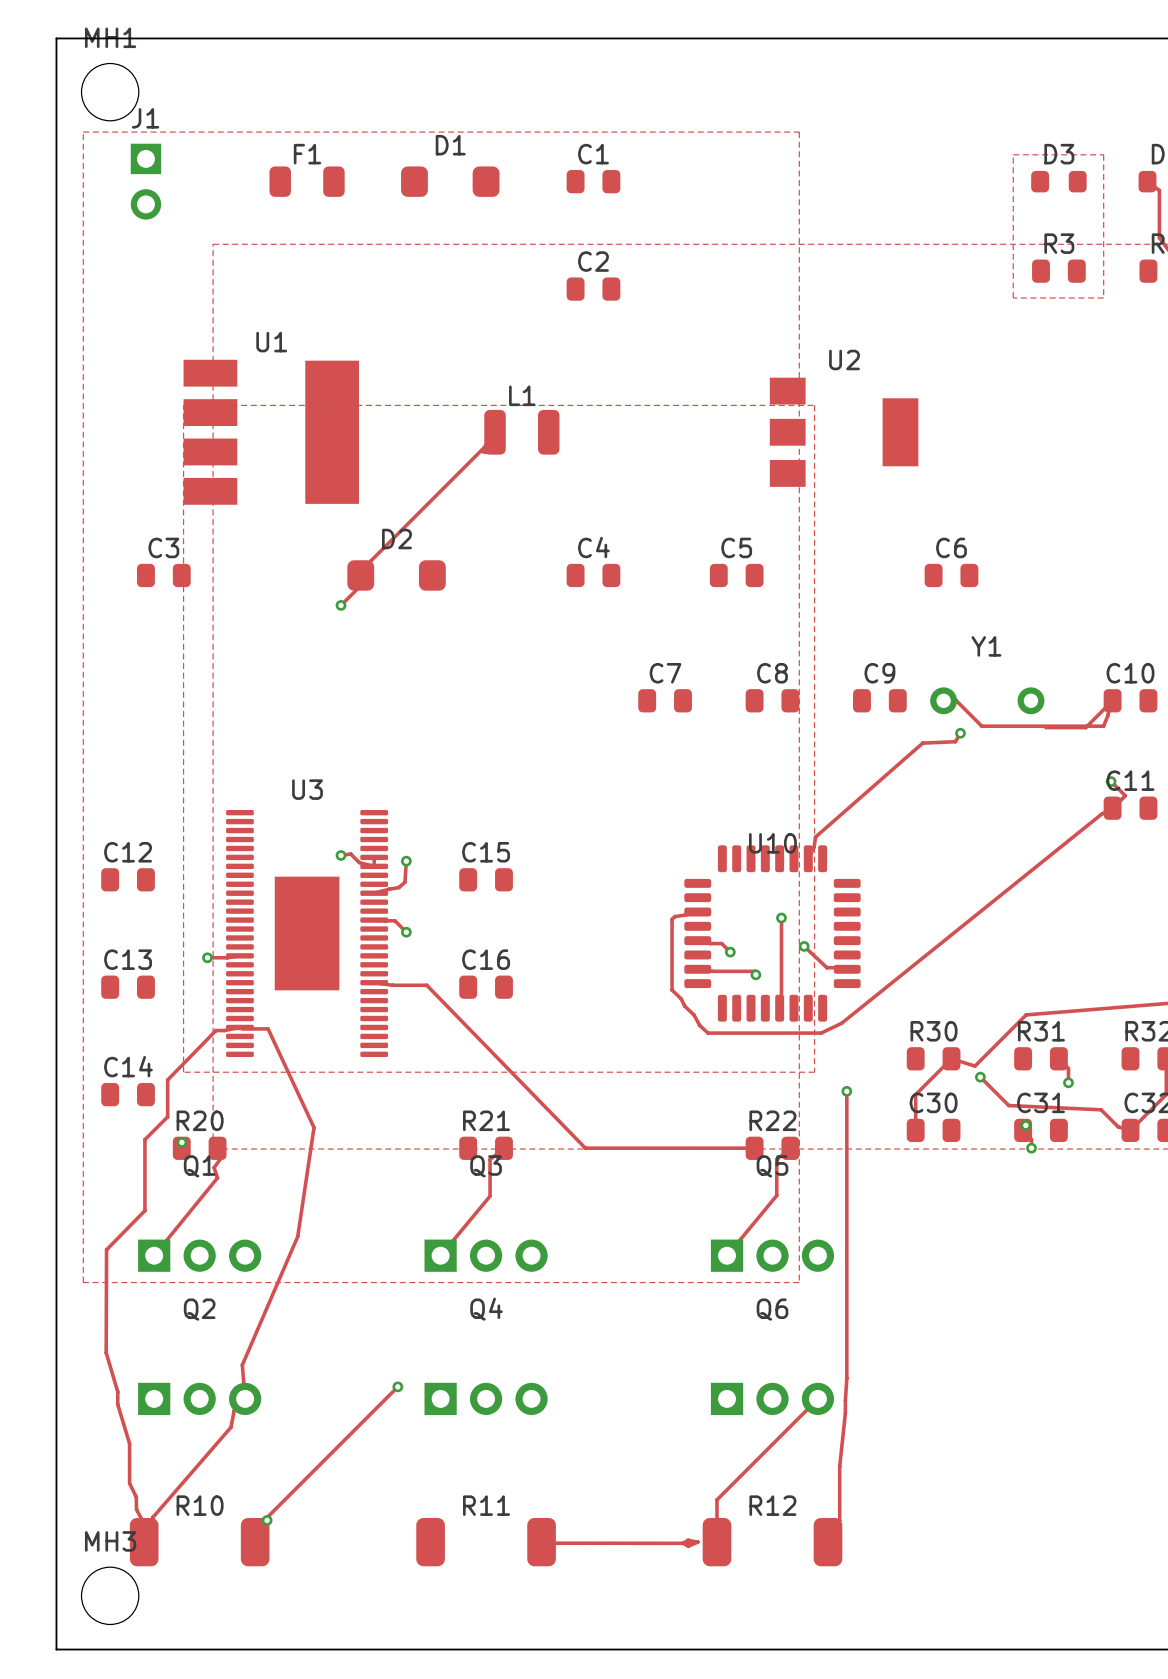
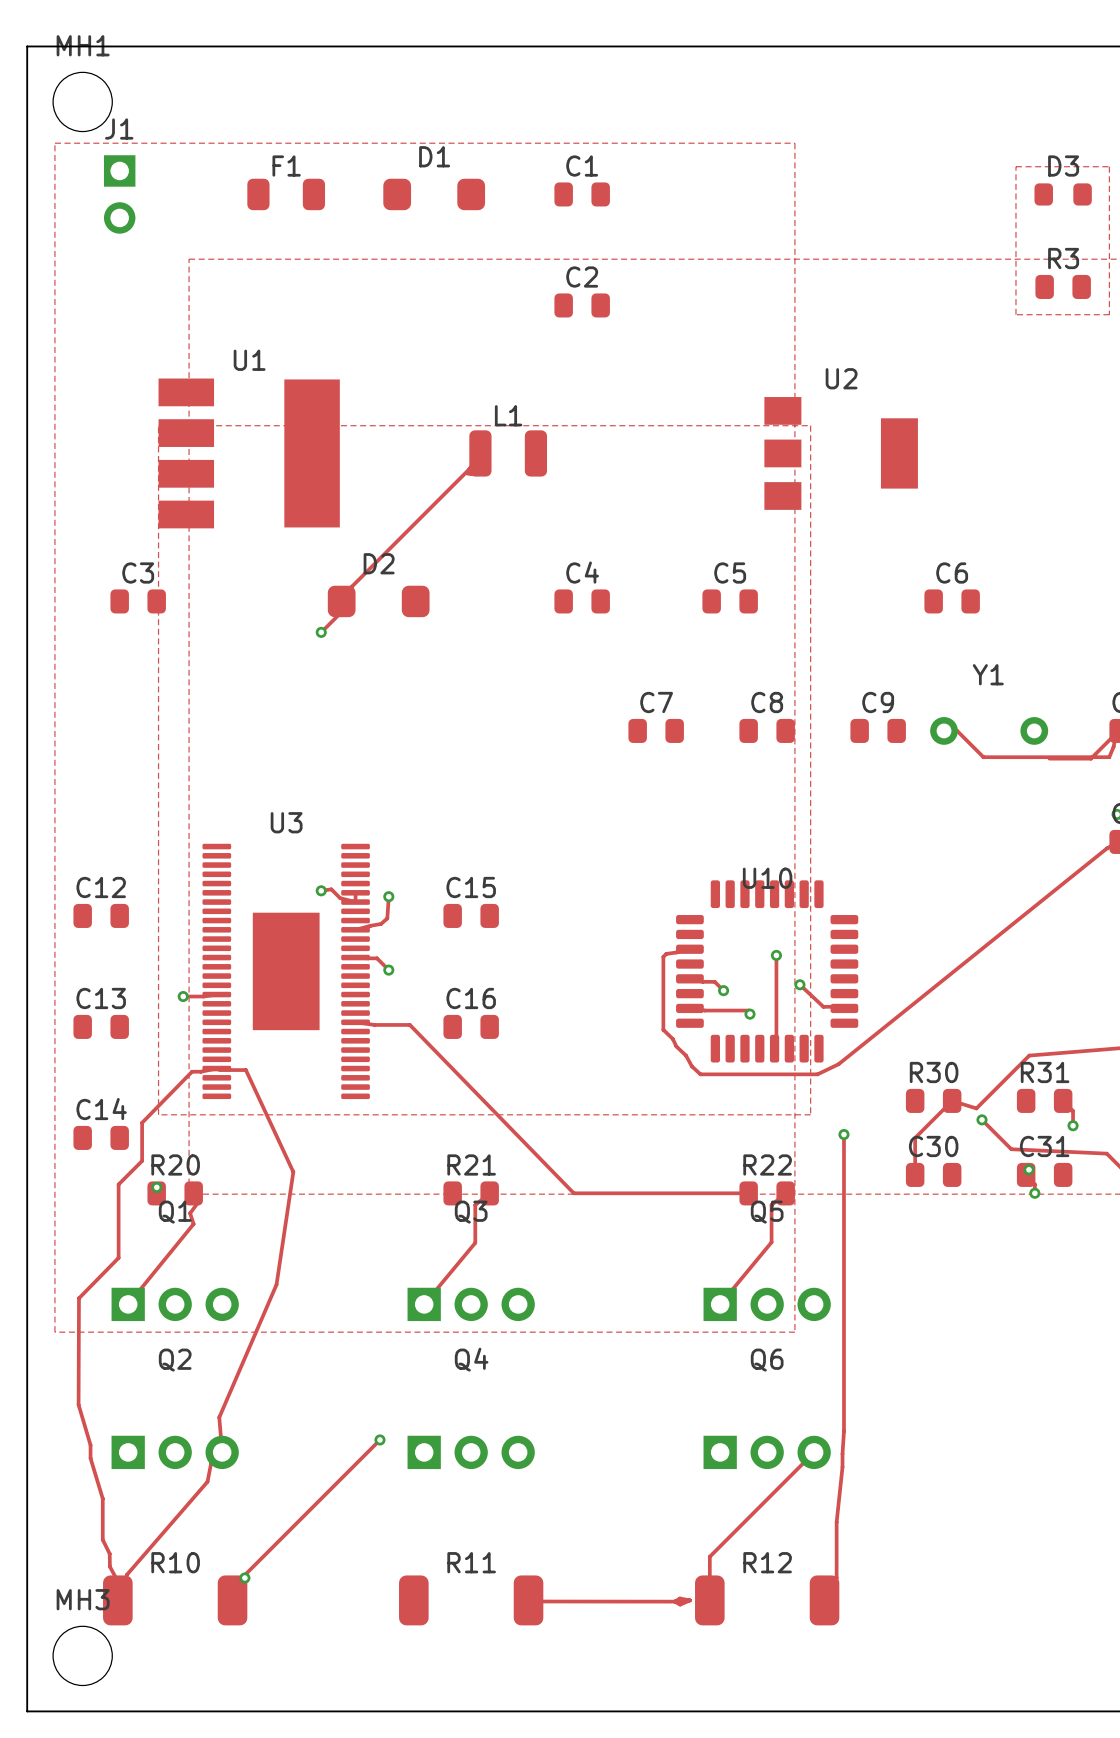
track: (960, 733) (955, 741) (922, 743) (815, 837) (814, 846) (808, 858) -> none
via: (960, 733) -> none

